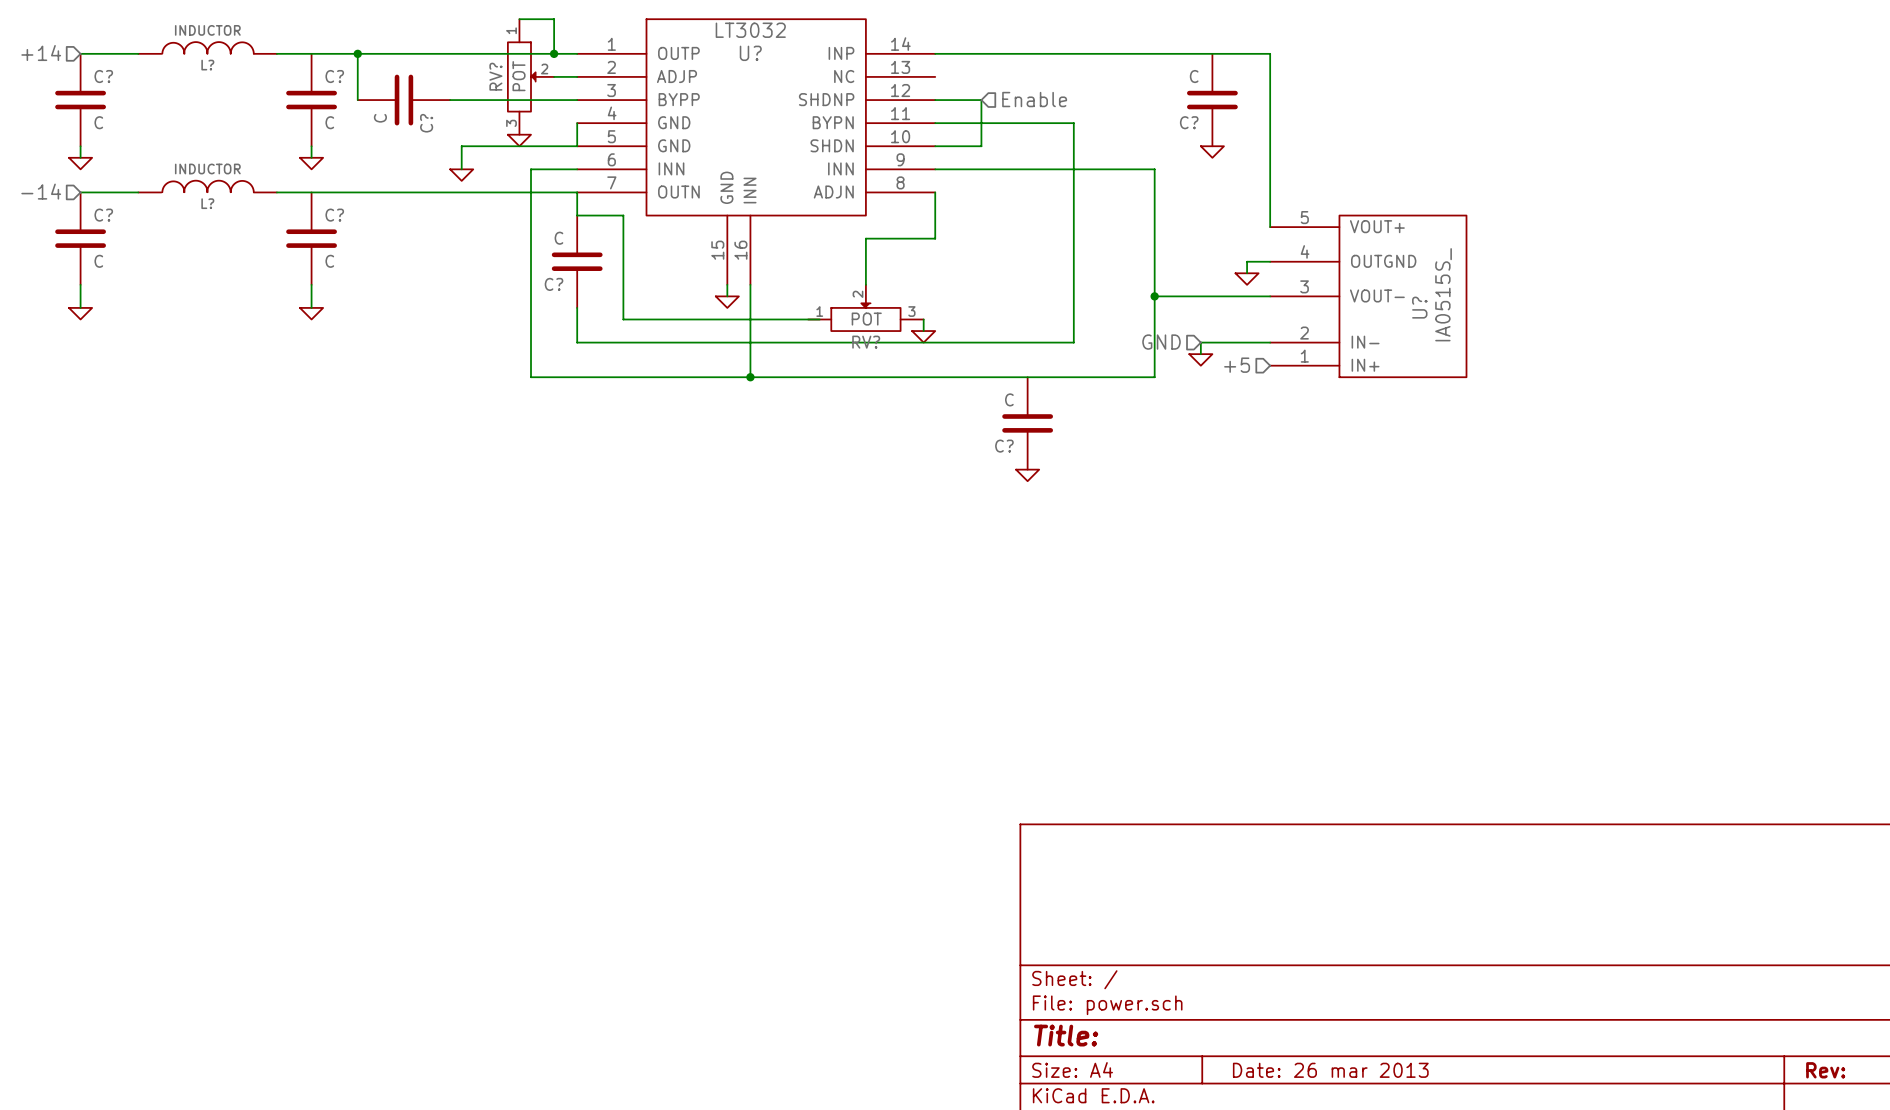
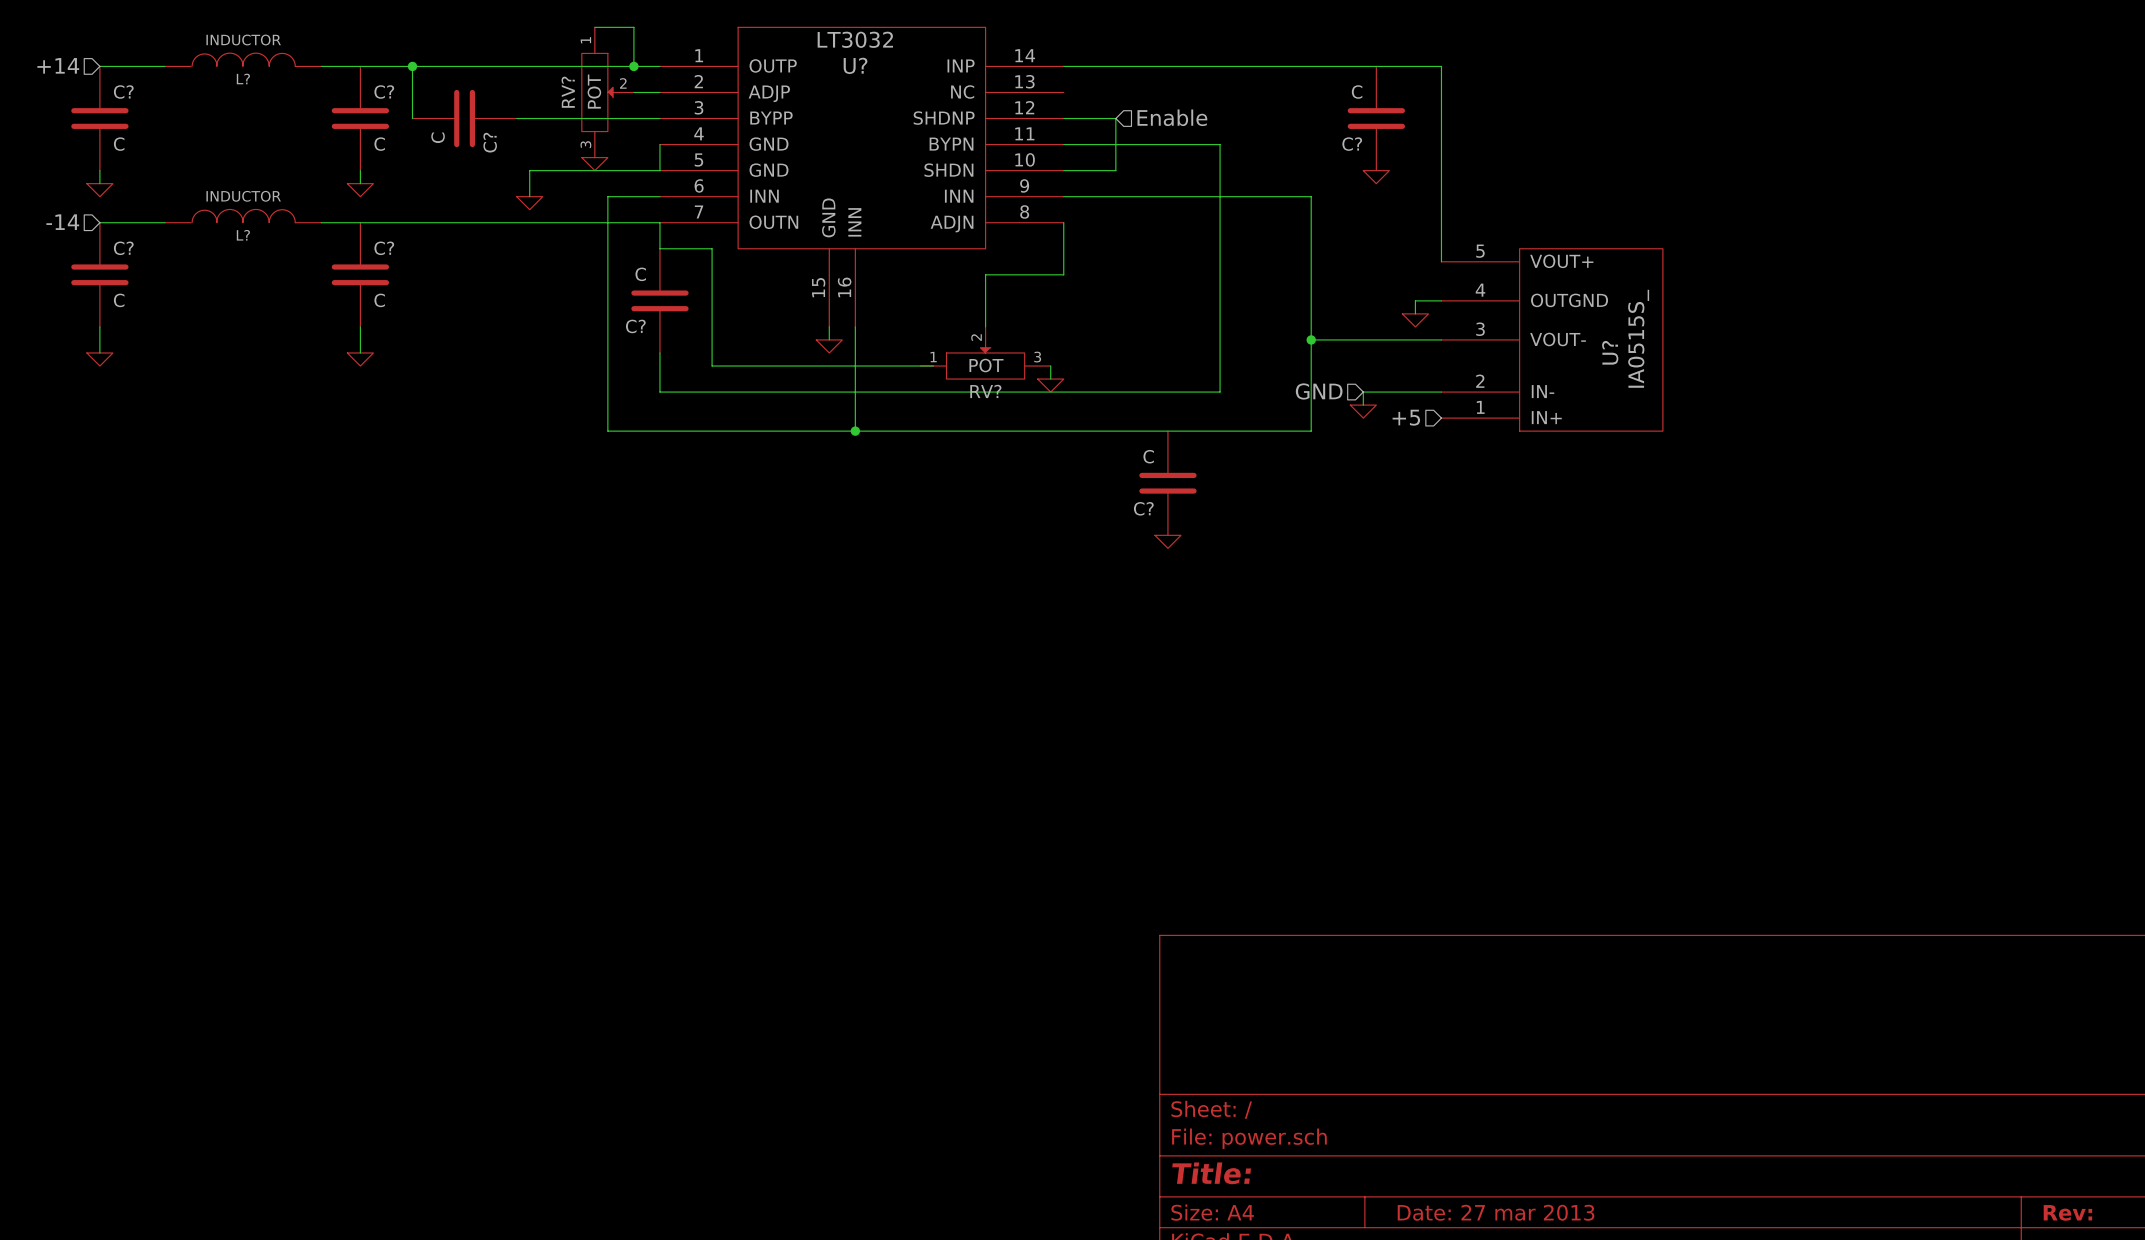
title block: Date: 26 mar 2013 (1330, 1070) -> Date: 27 mar 2013 (1496, 1212)

